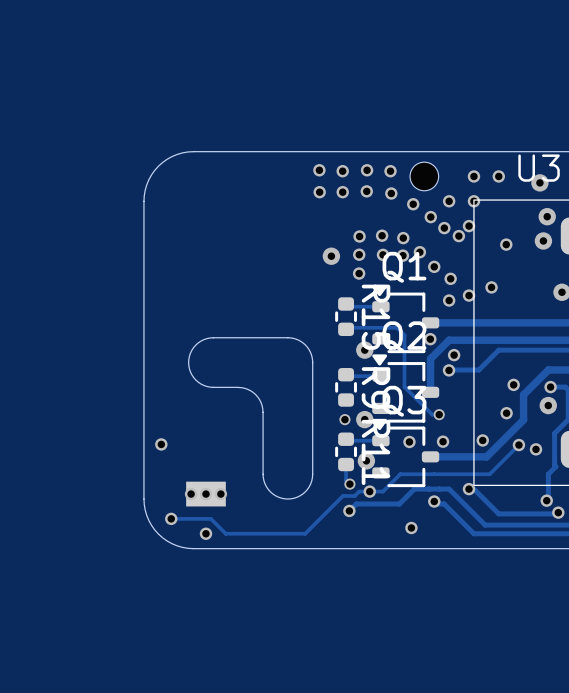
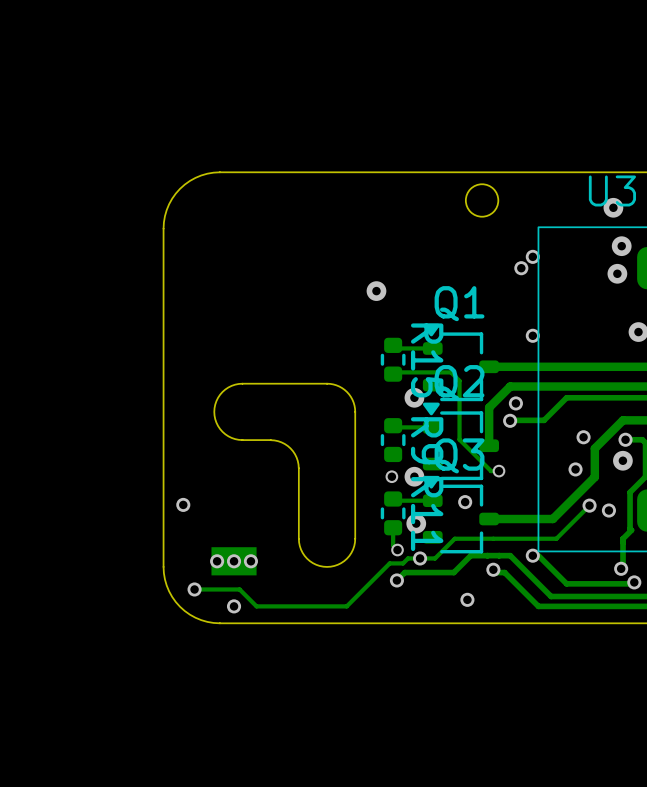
via: (319, 170) -> none
via: (367, 170) -> none
via: (342, 171) -> none
via: (390, 171) -> none
via: (473, 176) -> none
via: (498, 176) -> none
via: (366, 191) -> none
via: (319, 192) -> none
via: (342, 192) -> none
via: (391, 193) -> none
via: (449, 201) -> none
via: (473, 201) -> none
via: (413, 204) -> none
via: (430, 217) -> none
via: (444, 228) -> none
via: (382, 235) -> none
via: (359, 236) -> none
via: (403, 238) -> none
via: (506, 244) -> none
via: (419, 252) -> none
via: (359, 254) -> none
via: (383, 254) -> none
via: (402, 255) -> none
via: (434, 266) -> none
via: (359, 273) -> none
via: (450, 278) -> none
via: (491, 287) -> none
via: (449, 300) -> none
via: (430, 339) -> none
via: (482, 440) -> none
via: (443, 441) -> none

